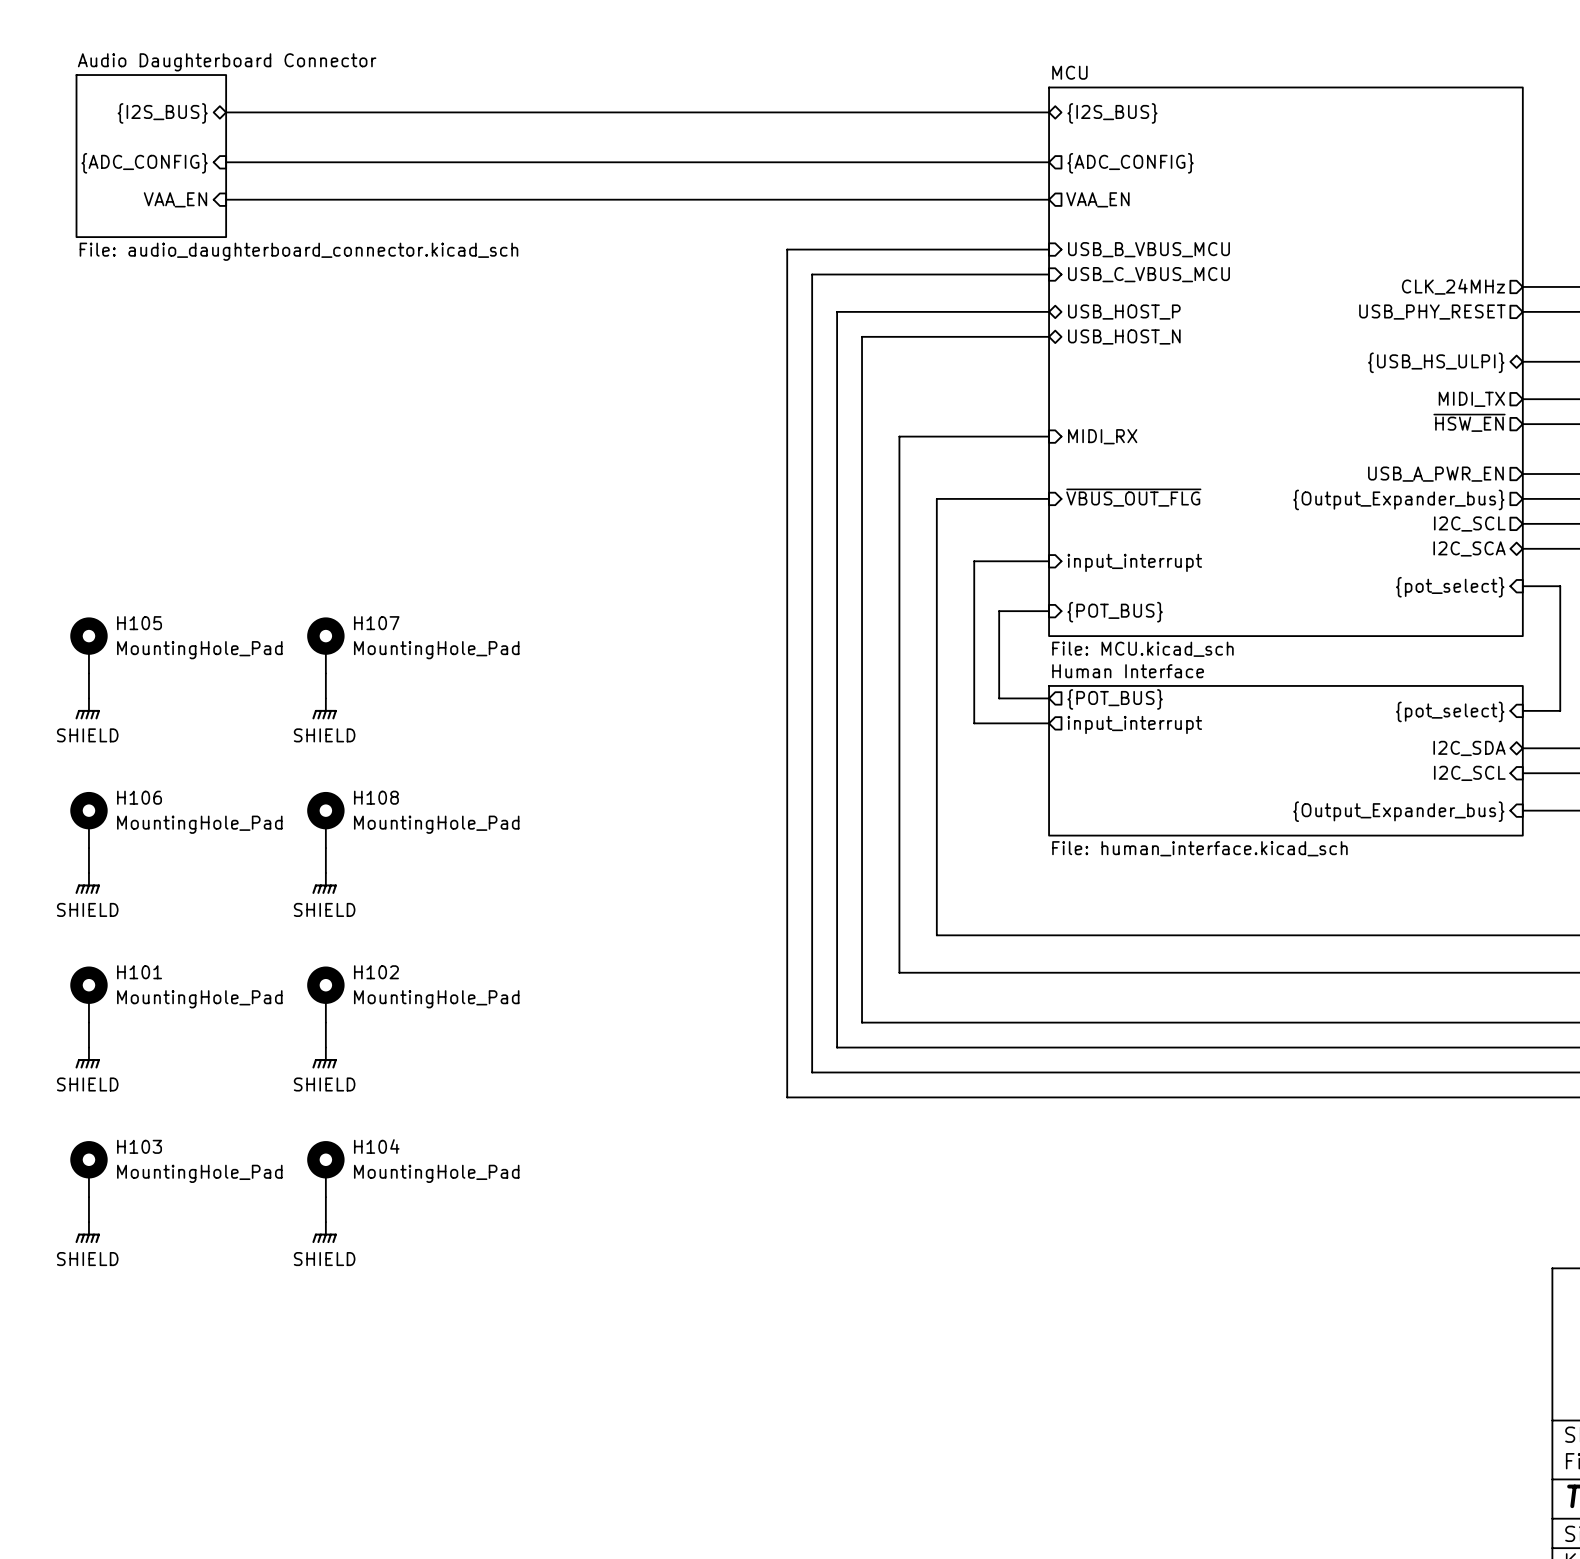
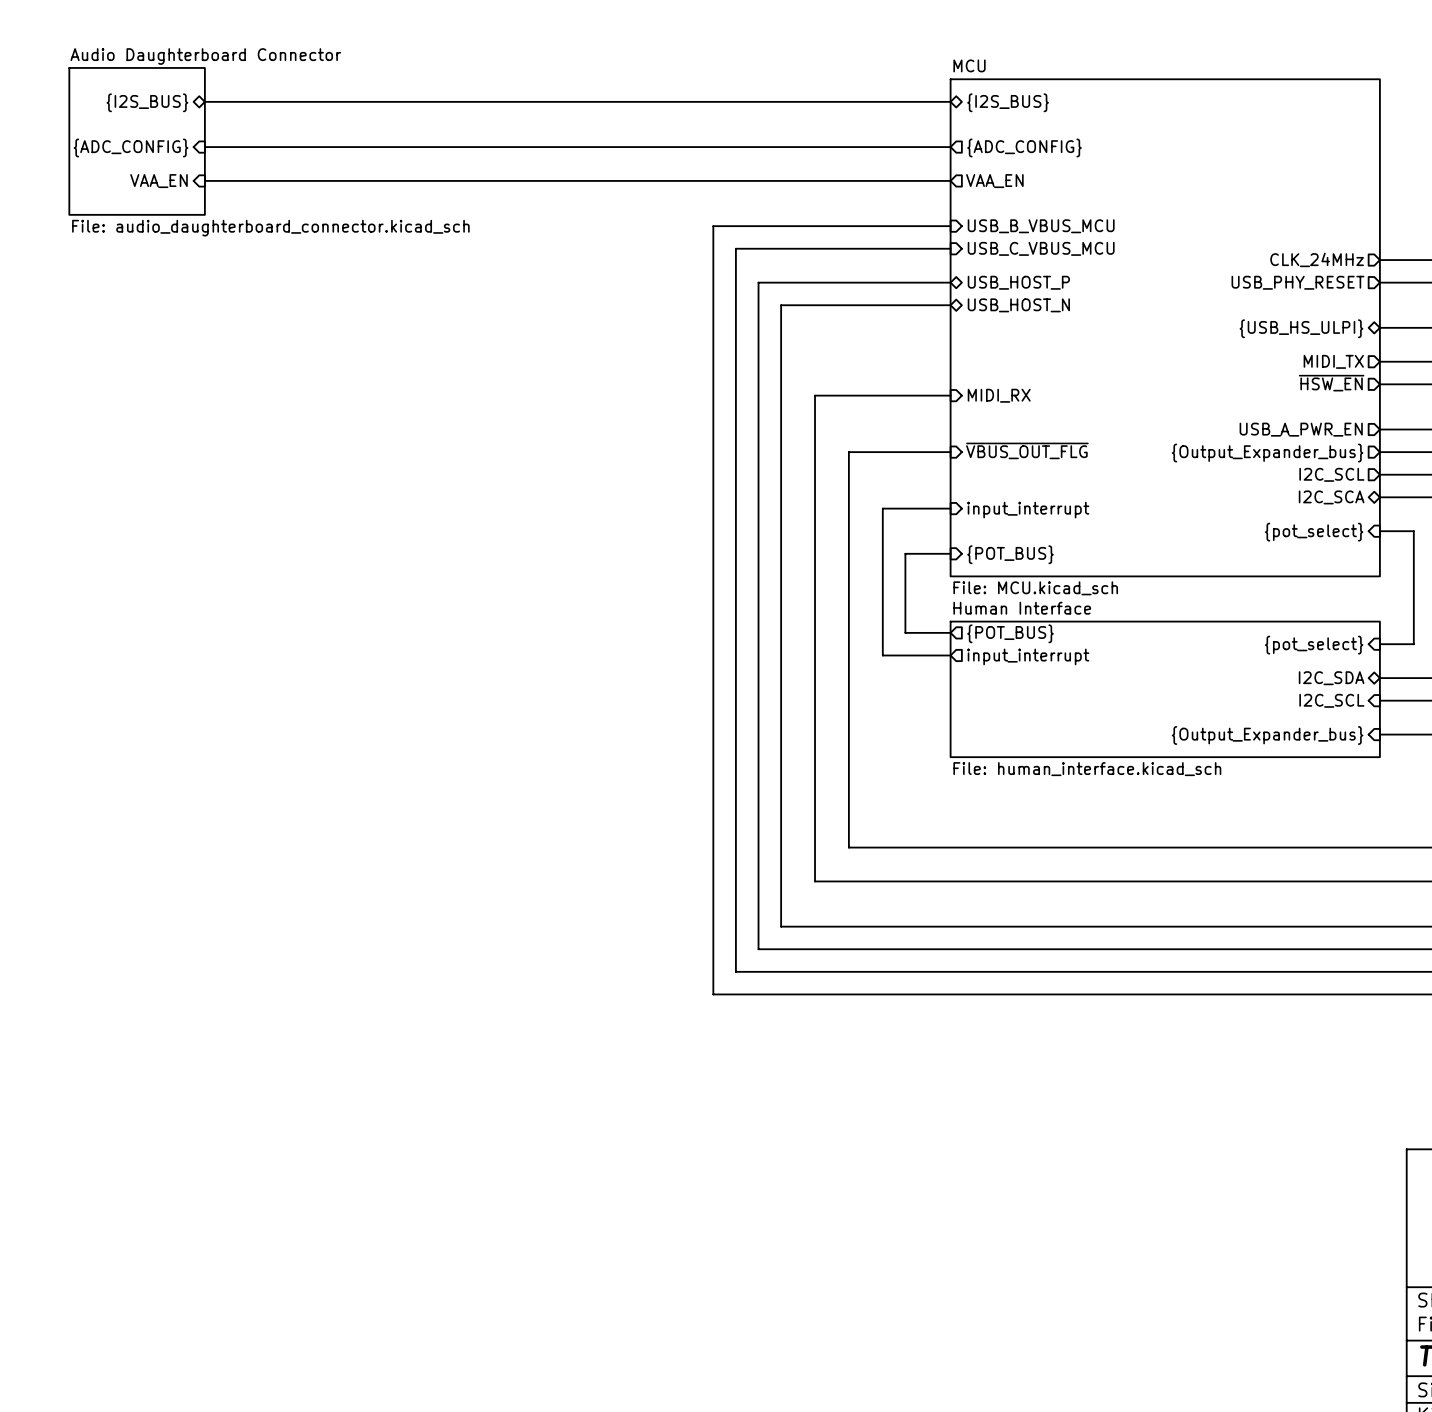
H105: MountingHole_Pad (88, 645) -> none
H107: MountingHole_Pad (325, 645) -> none
wire: (88, 673) (88, 698) -> none
wire: (325, 673) (325, 698) -> none
power symbol: SHIELD (87, 708) -> none
power symbol: SHIELD (324, 708) -> none
H106: MountingHole_Pad (88, 820) -> none
H108: MountingHole_Pad (325, 820) -> none
wire: (88, 848) (88, 872) -> none
wire: (325, 848) (325, 872) -> none
power symbol: SHIELD (87, 883) -> none
power symbol: SHIELD (324, 883) -> none
H101: MountingHole_Pad (88, 994) -> none
H102: MountingHole_Pad (325, 994) -> none
wire: (88, 1022) (88, 1047) -> none
wire: (325, 1022) (325, 1047) -> none
power symbol: SHIELD (87, 1058) -> none
power symbol: SHIELD (324, 1058) -> none
H103: MountingHole_Pad (88, 1169) -> none
H104: MountingHole_Pad (325, 1169) -> none
wire: (88, 1197) (88, 1222) -> none
wire: (325, 1197) (325, 1222) -> none
power symbol: SHIELD (87, 1232) -> none
power symbol: SHIELD (324, 1232) -> none

